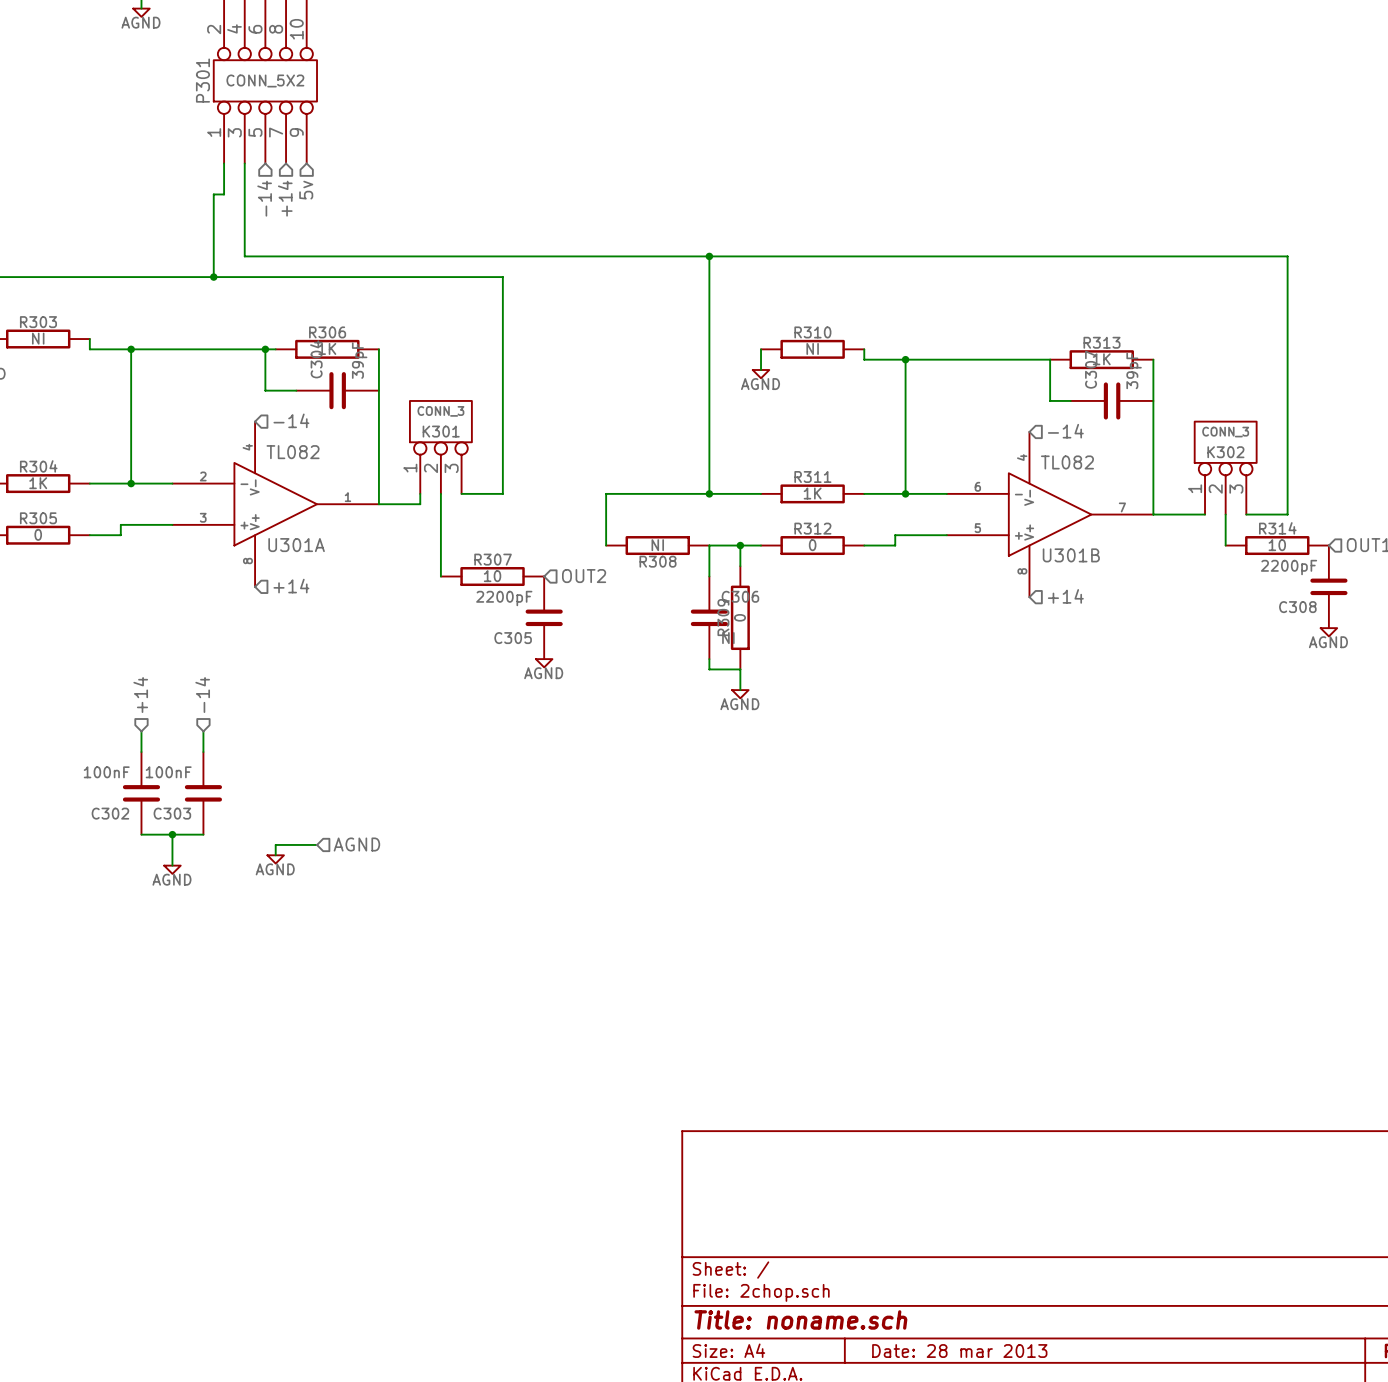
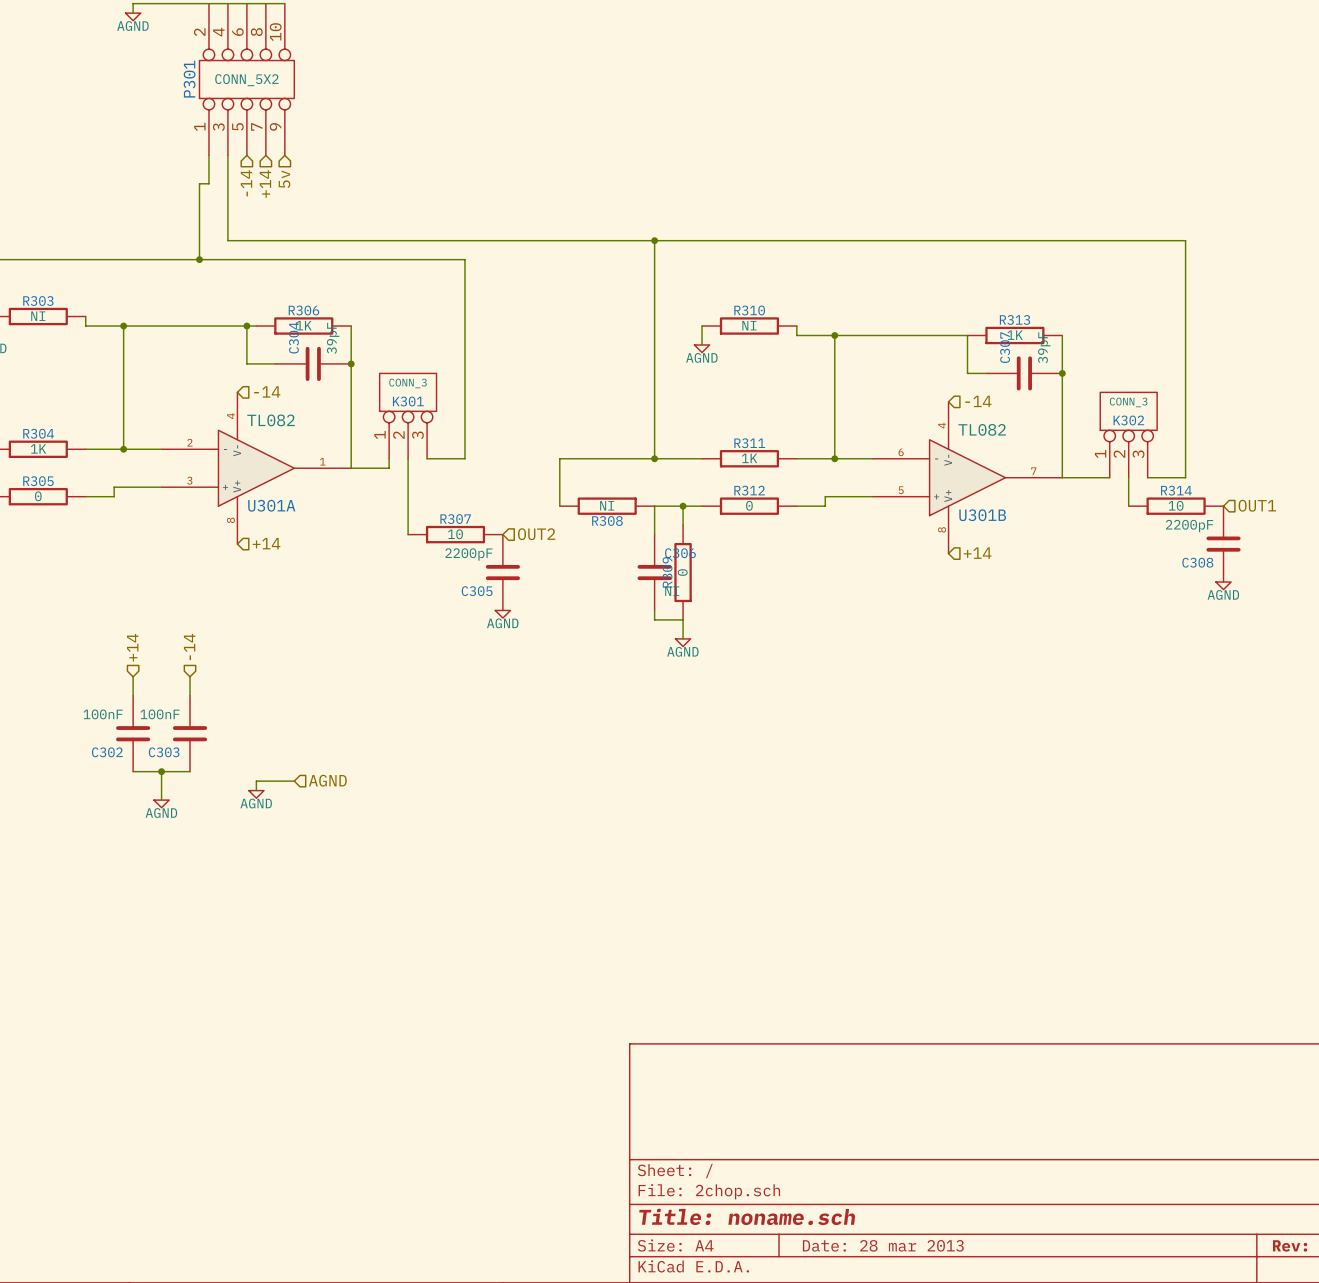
junction: none -> (351, 363)
junction: none -> (1062, 373)

